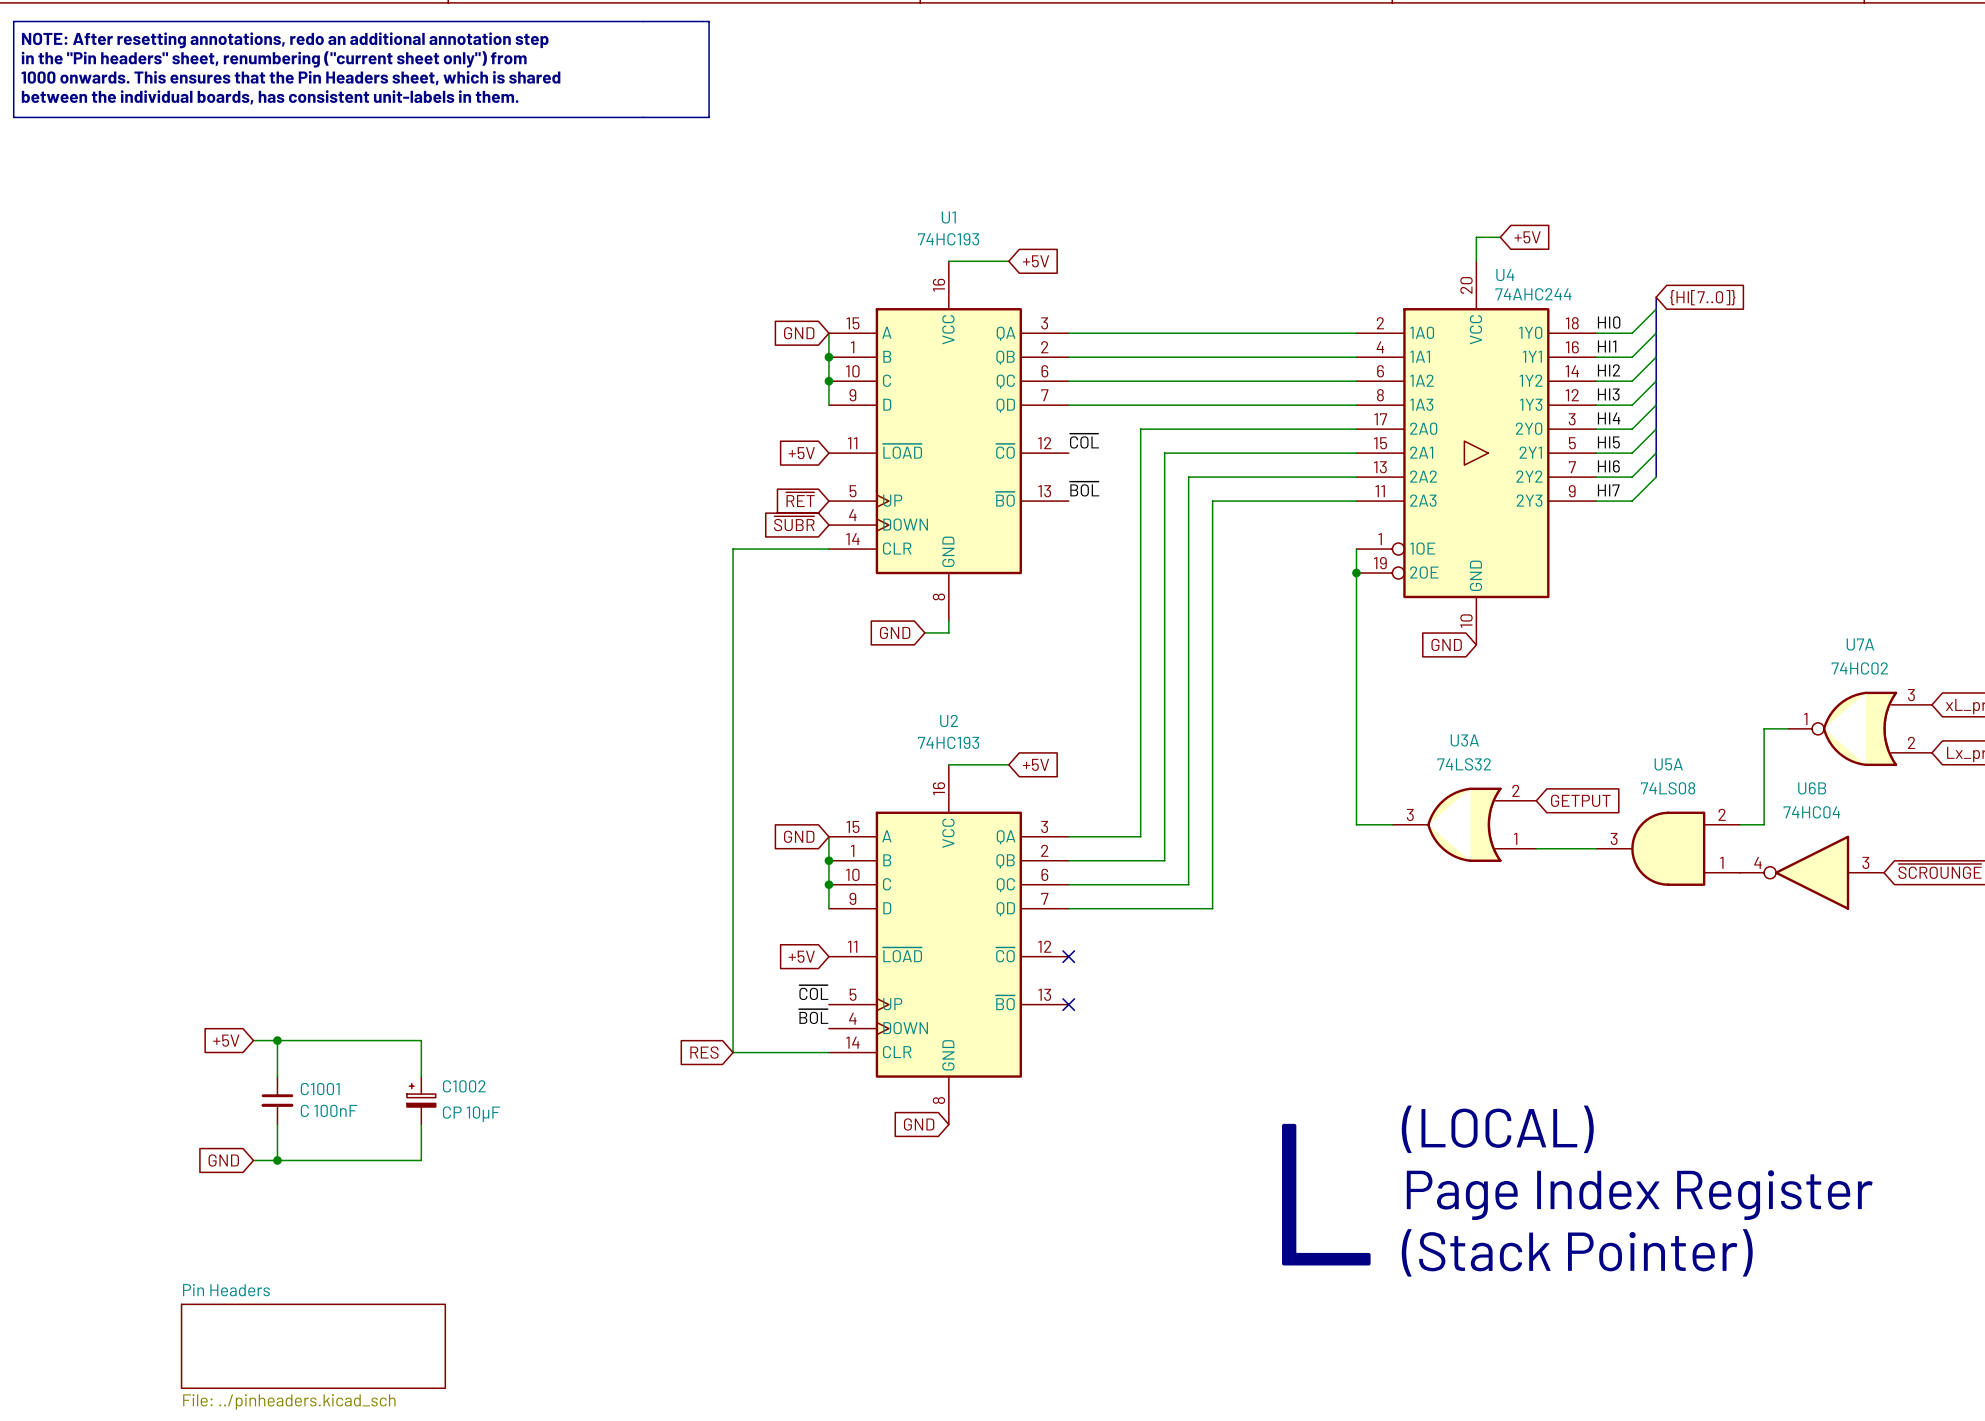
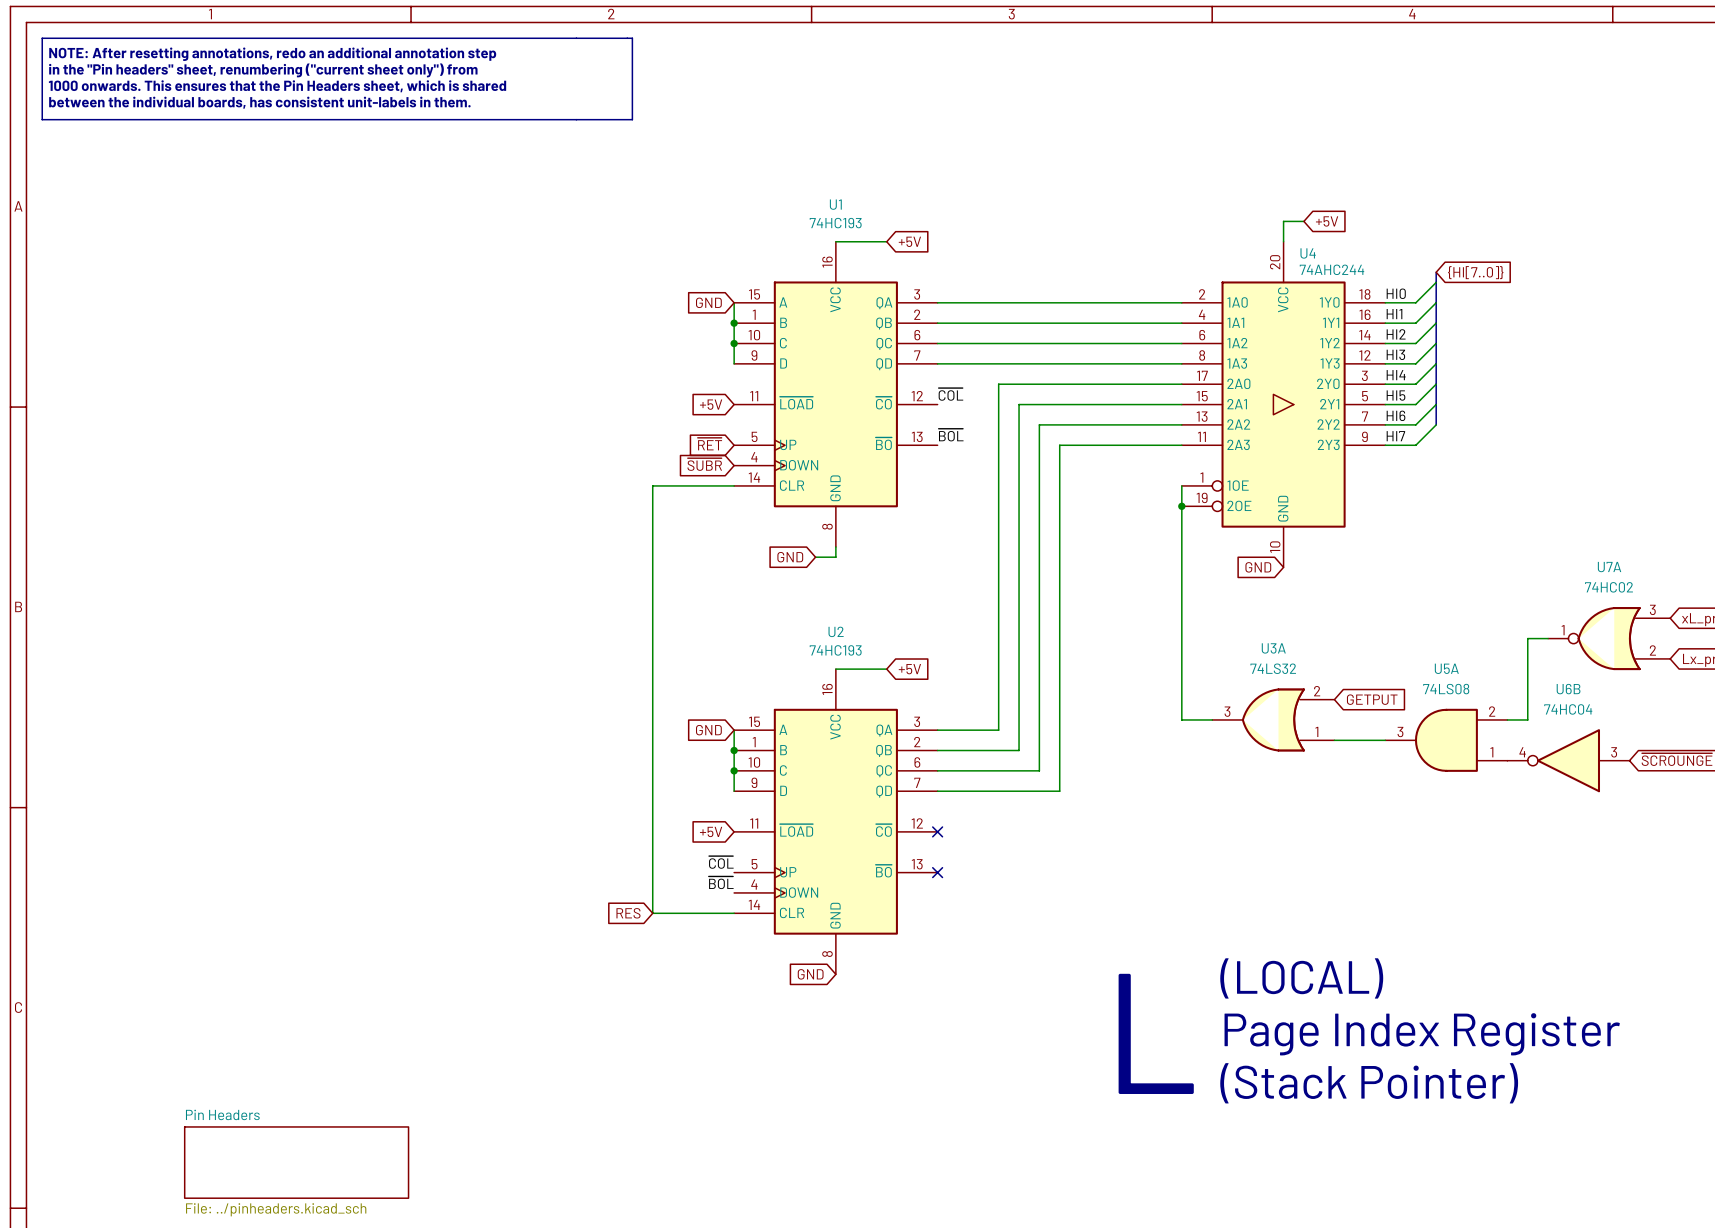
global label: +5V (226, 1040) -> none
wire: (253, 1040) (421, 1040) (421, 1076) -> none
wire: (277, 1040) (277, 1076) -> none
junction: (277, 1040) -> none
C1001: C 100nF (277, 1100) -> none
C1002: CP 10μF (421, 1100) -> none
wire: (277, 1124) (277, 1160) -> none
wire: (421, 1124) (421, 1160) (253, 1160) -> none
global label: GND (223, 1160) -> none
junction: (277, 1160) -> none

